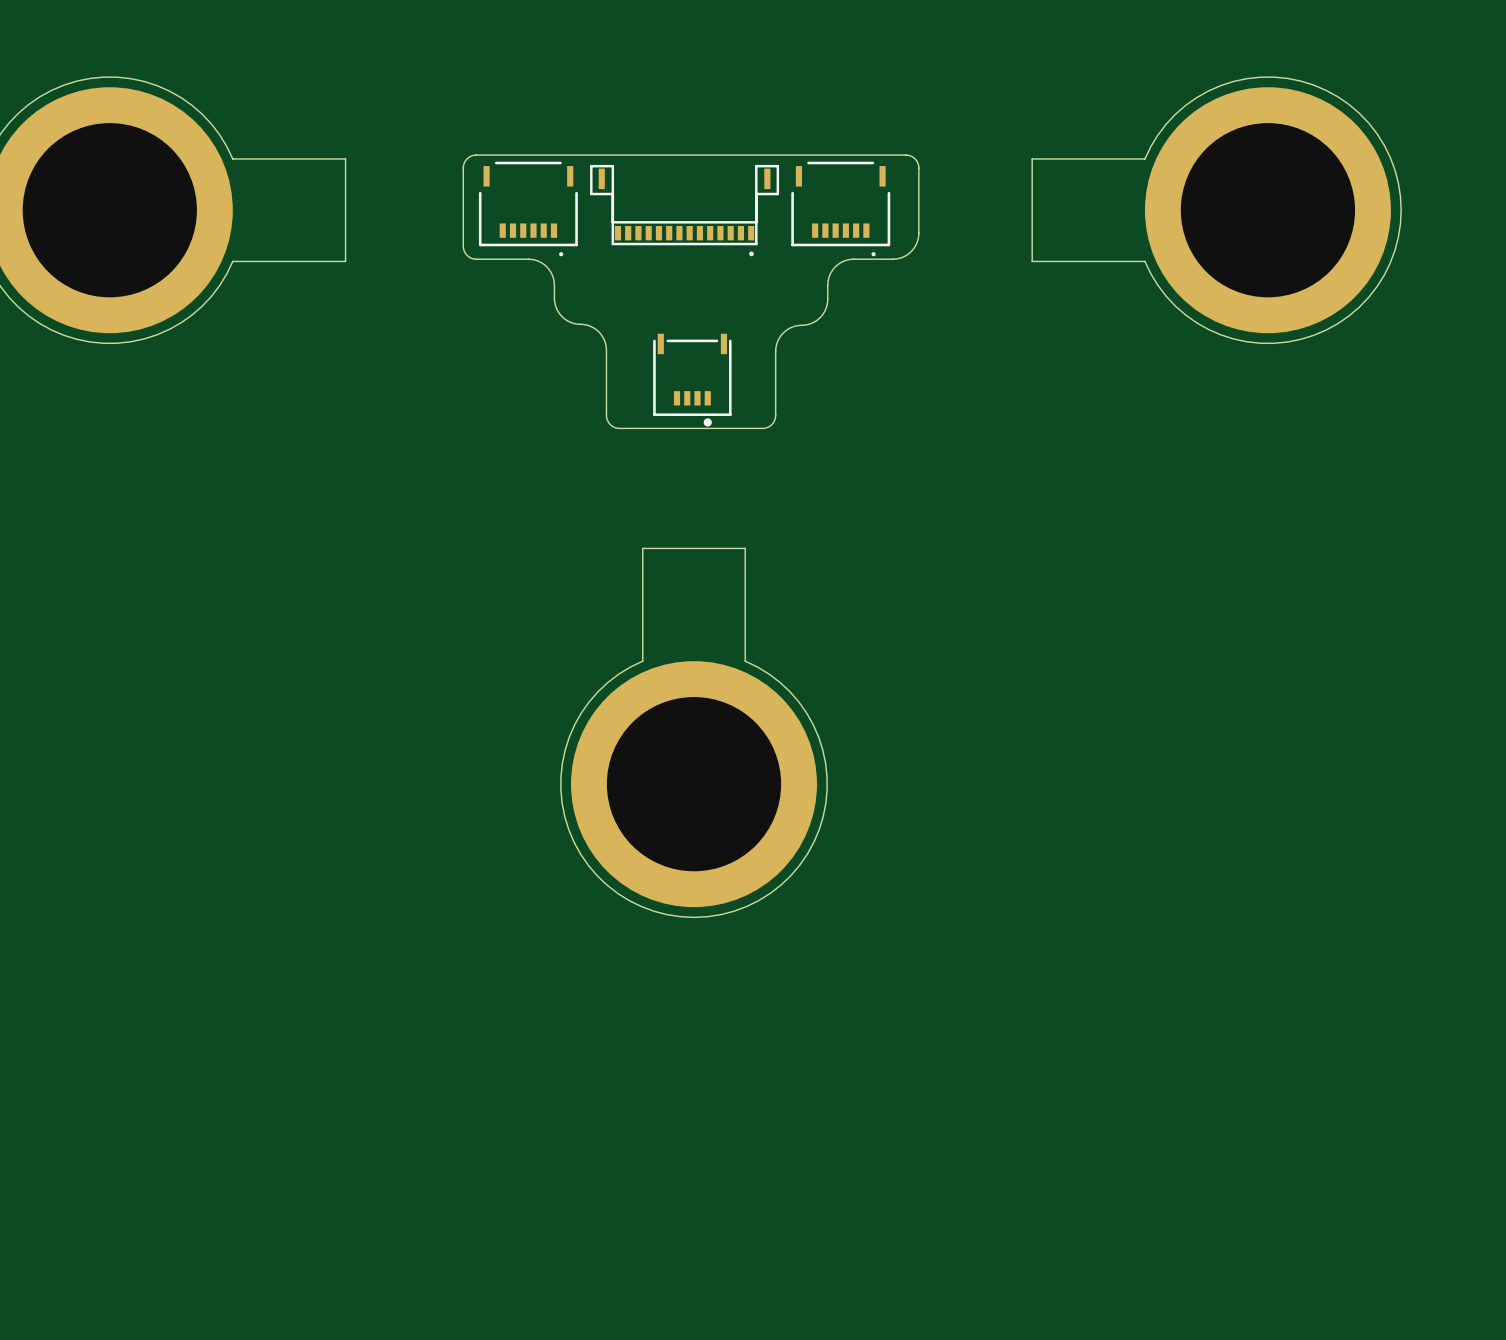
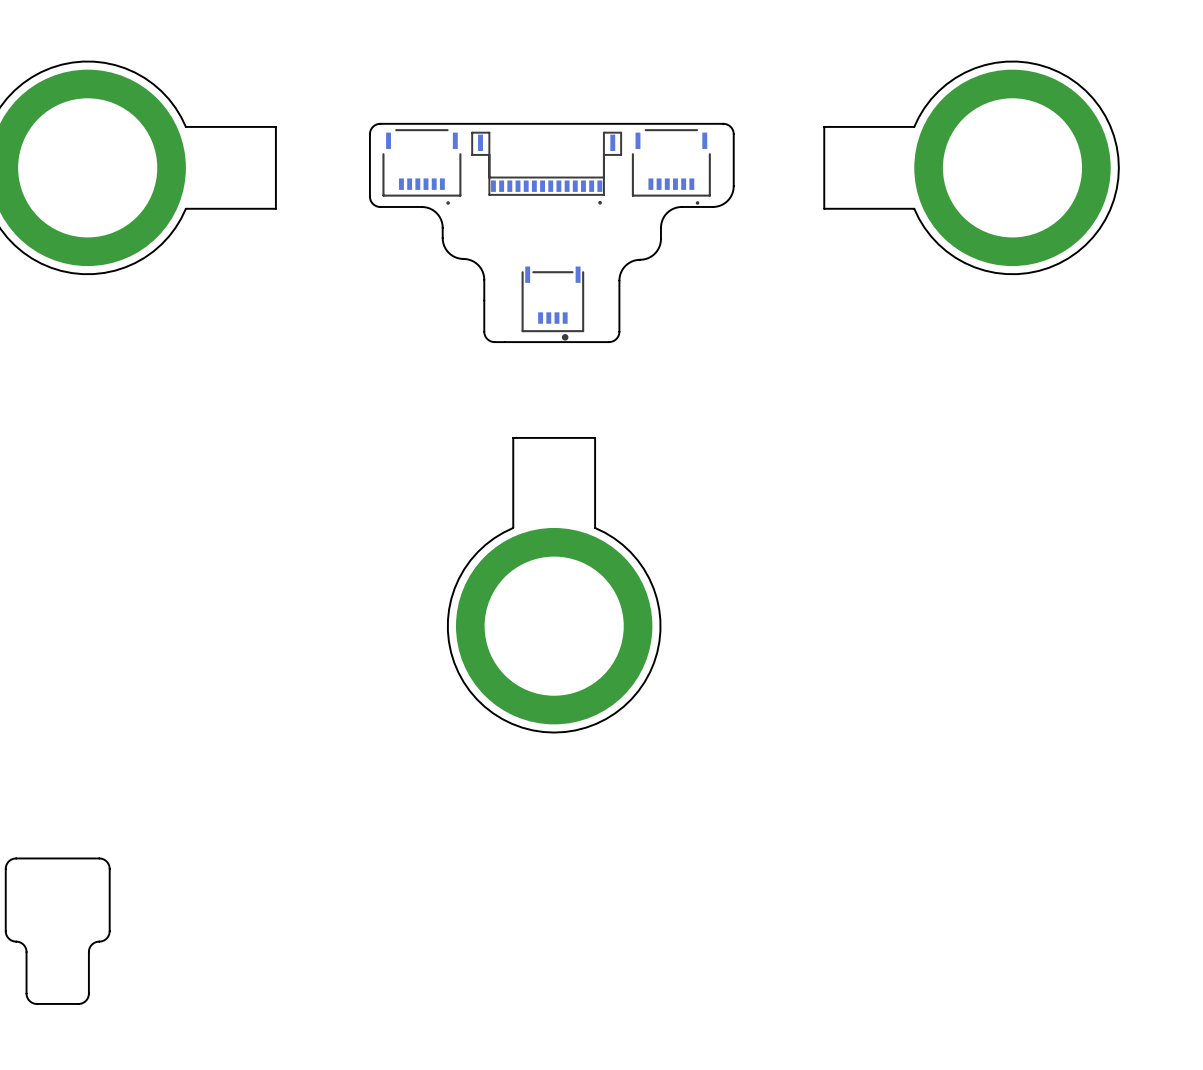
board edge: none -> (99, 858) (14, 858) (6, 864) (5, 932) (9, 939) (21, 943) (25, 948) (26, 994) (32, 1003) (79, 1003) (88, 997) (89, 949) (94, 943) (105, 939) (109, 932) (109, 867) (105, 860) (99, 858)

